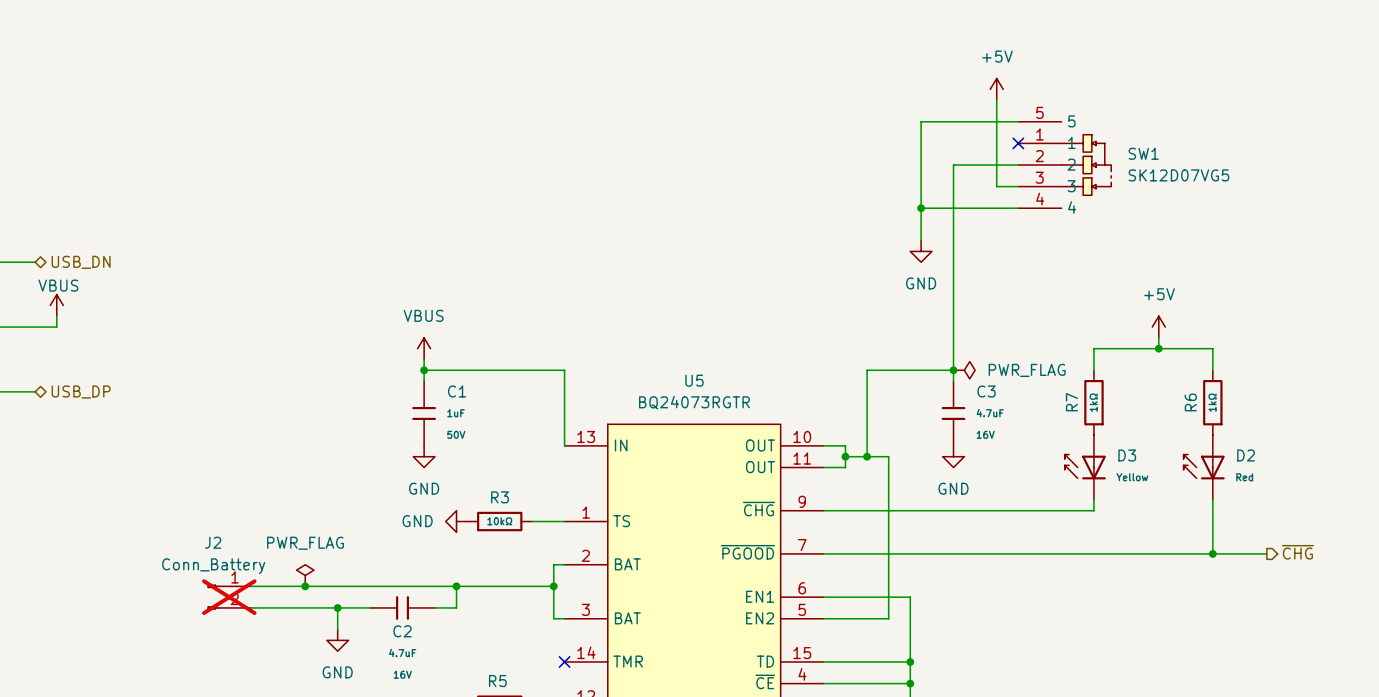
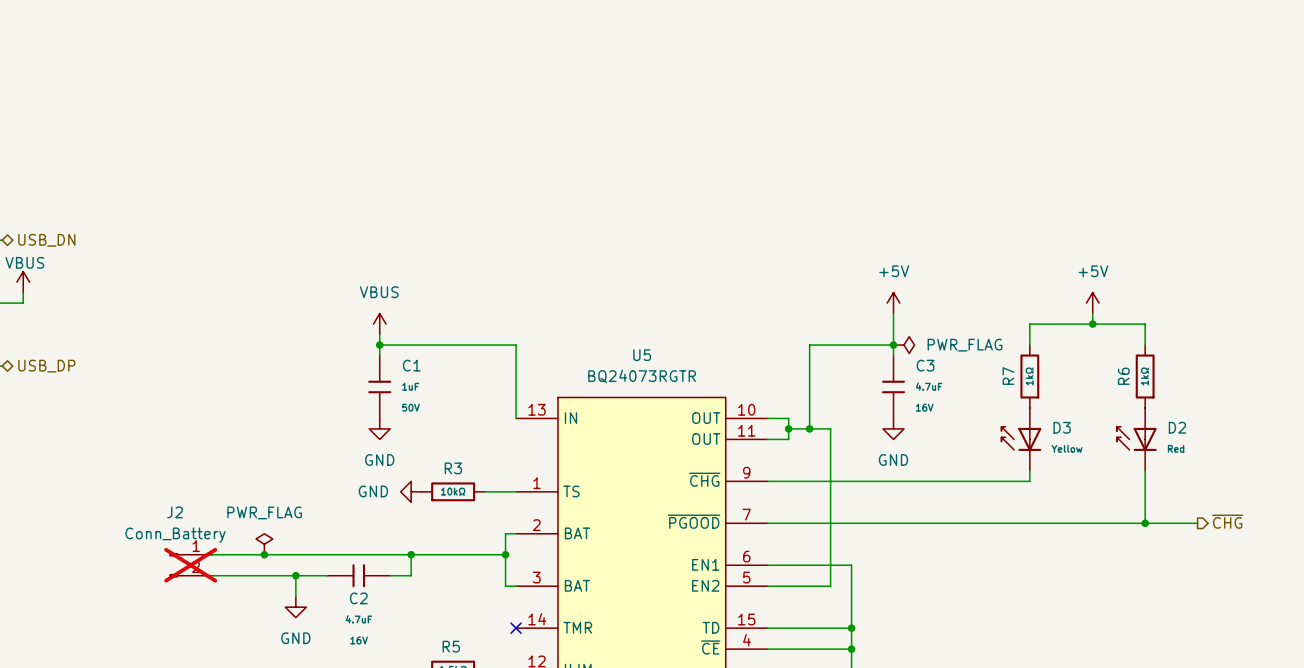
power symbol: +5V (996, 89) -> none
wire: (996, 100) (996, 186) (1018, 186) -> none
wire: (1018, 121) (921, 121) (921, 240) -> none
no-connect mark: (1018, 143) -> none
wire: (1018, 165) (953, 165) (953, 337) -> none
SW1: SK12D07VG5 (1064, 165) -> none
wire: (921, 208) (1018, 208) -> none
junction: (921, 208) -> none
power symbol: GND (921, 251) -> none
power symbol: none -> +5V (893, 303)

